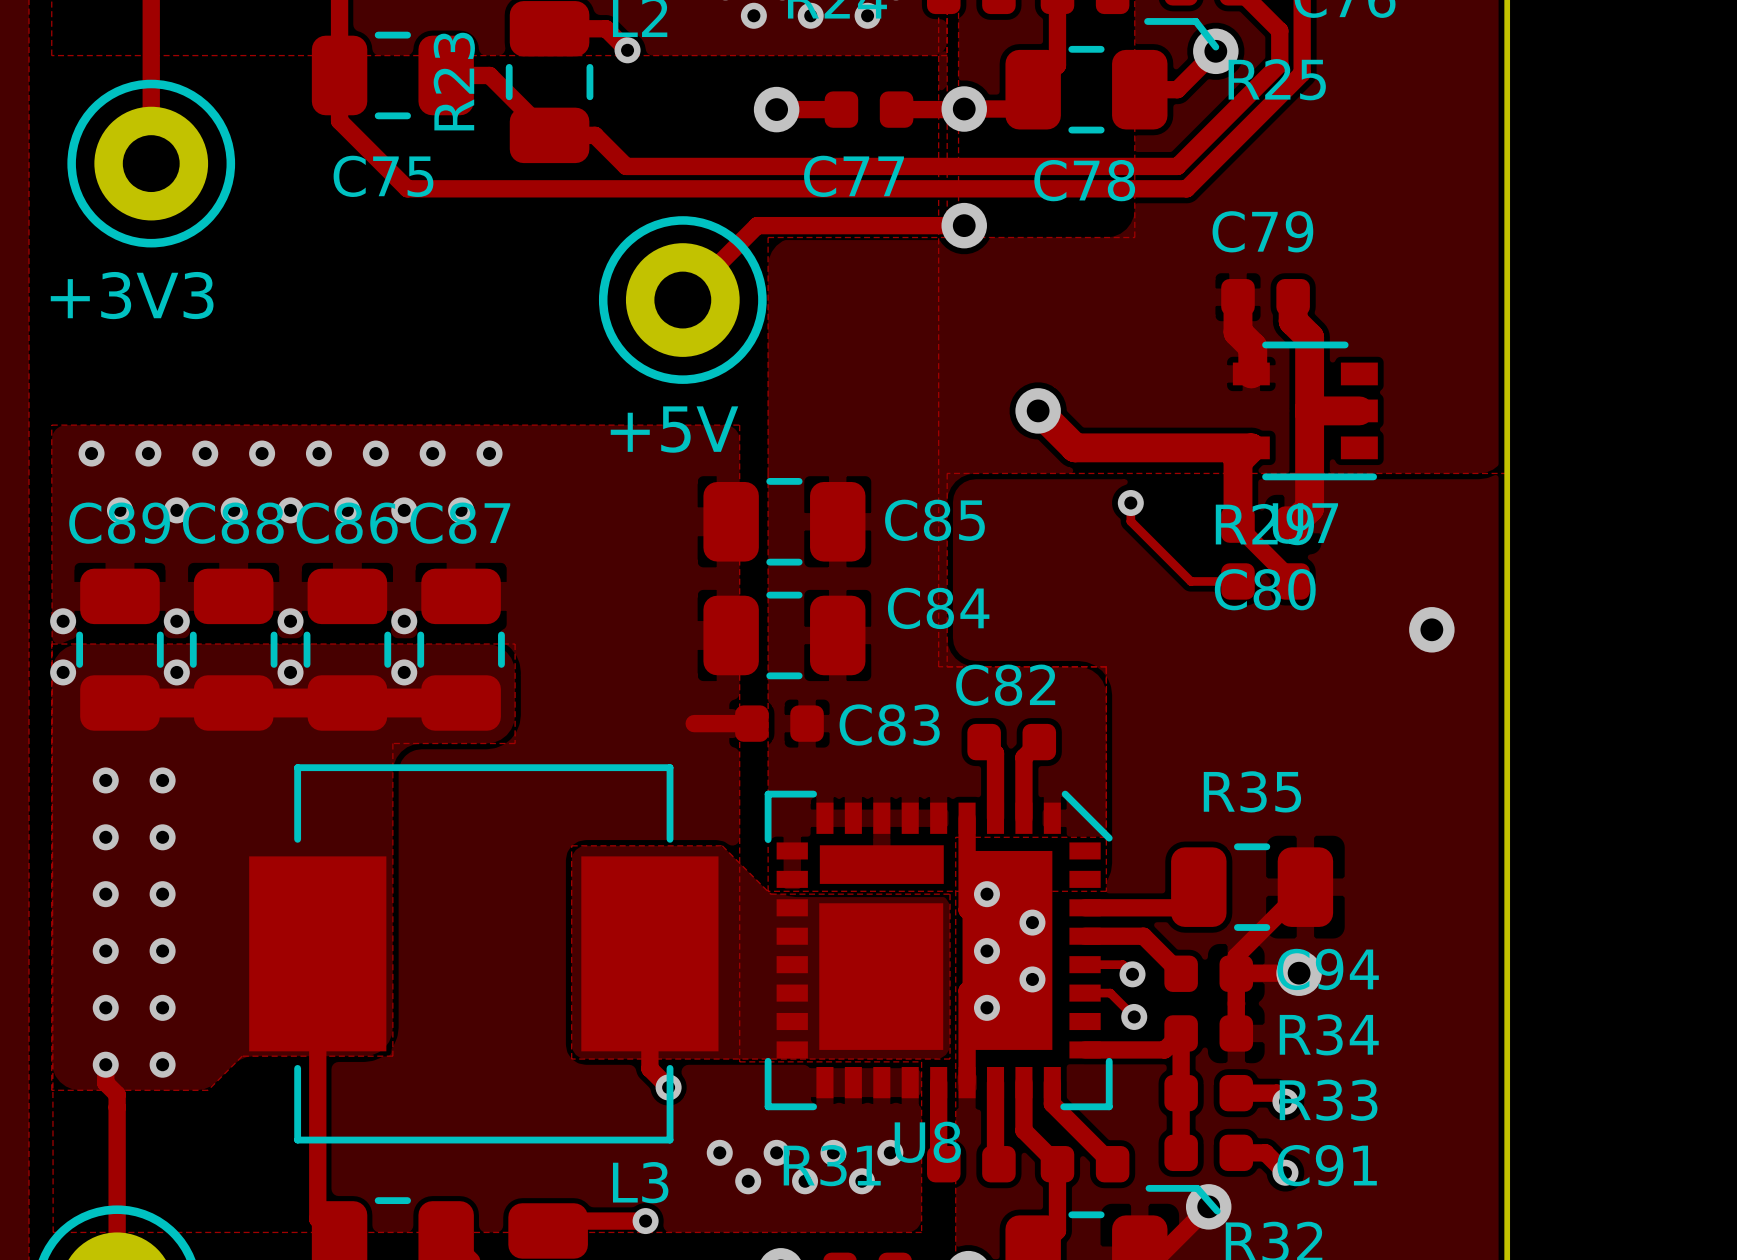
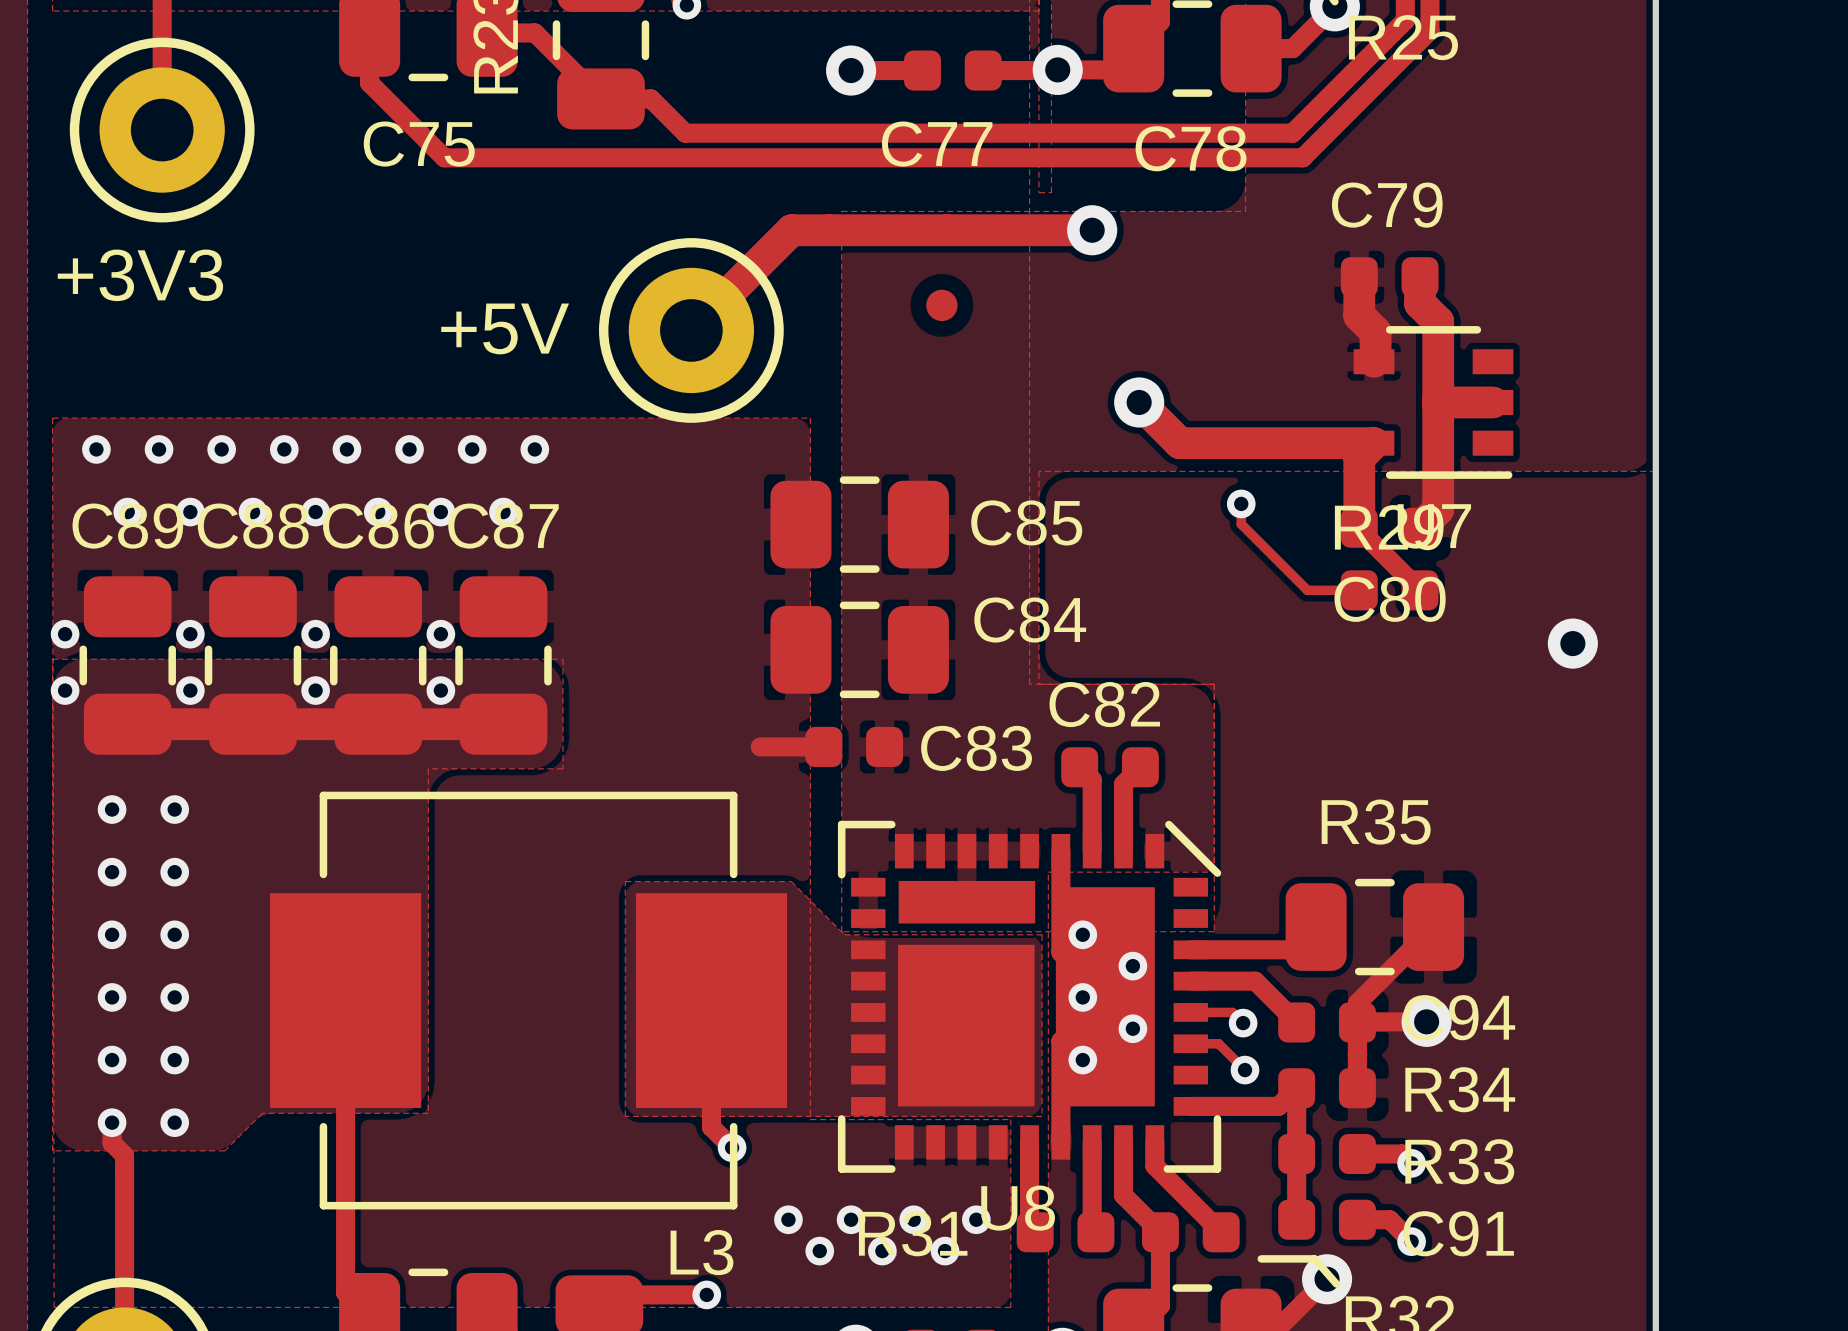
track: (964, 225) (757, 225) (682, 300) -> none
via position: (964, 225) -> (1092, 230)
track: none -> (1092, 230) (791, 230) (691, 330)
part position: (682, 300) -> (691, 330)
part: none -> (941, 305)
text position: +5V (674, 429) -> +5V (505, 328)

